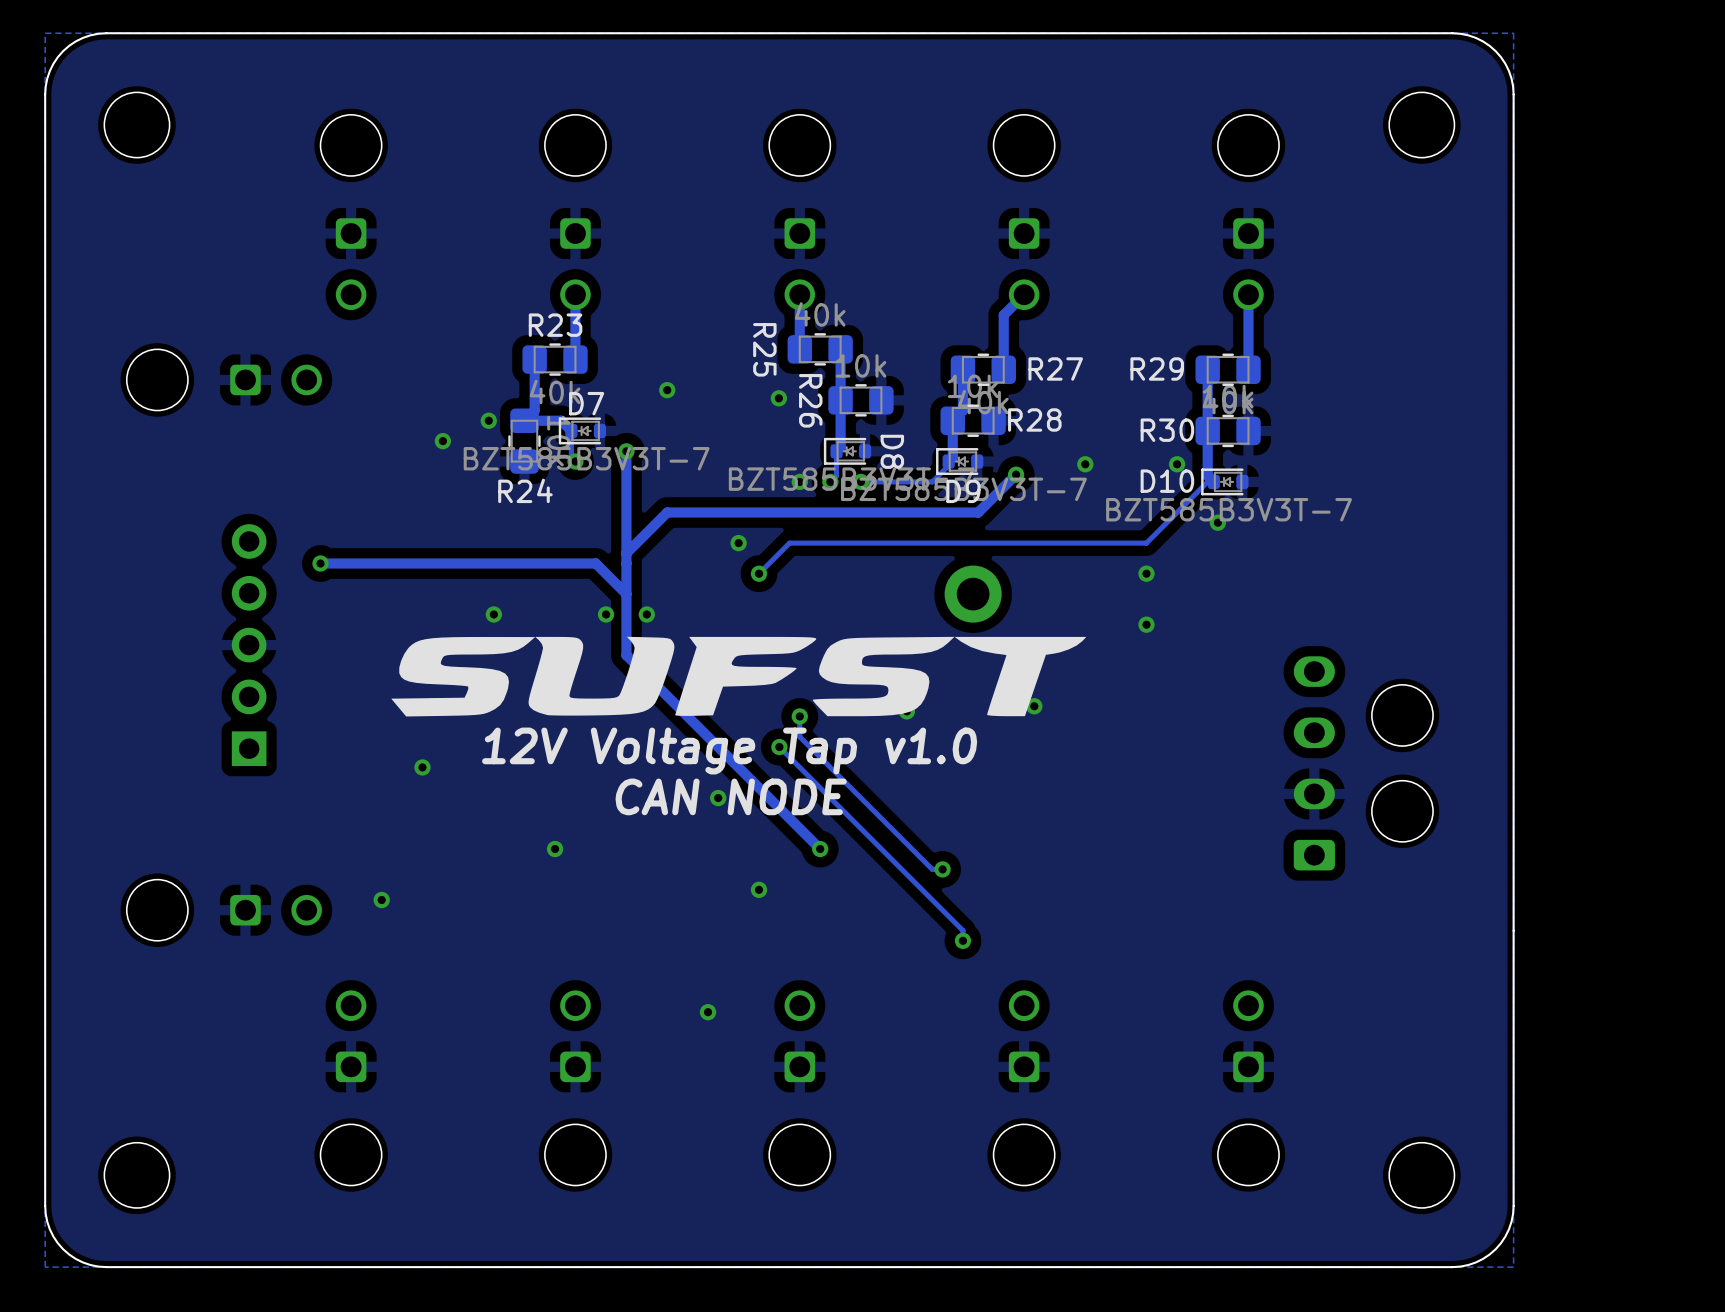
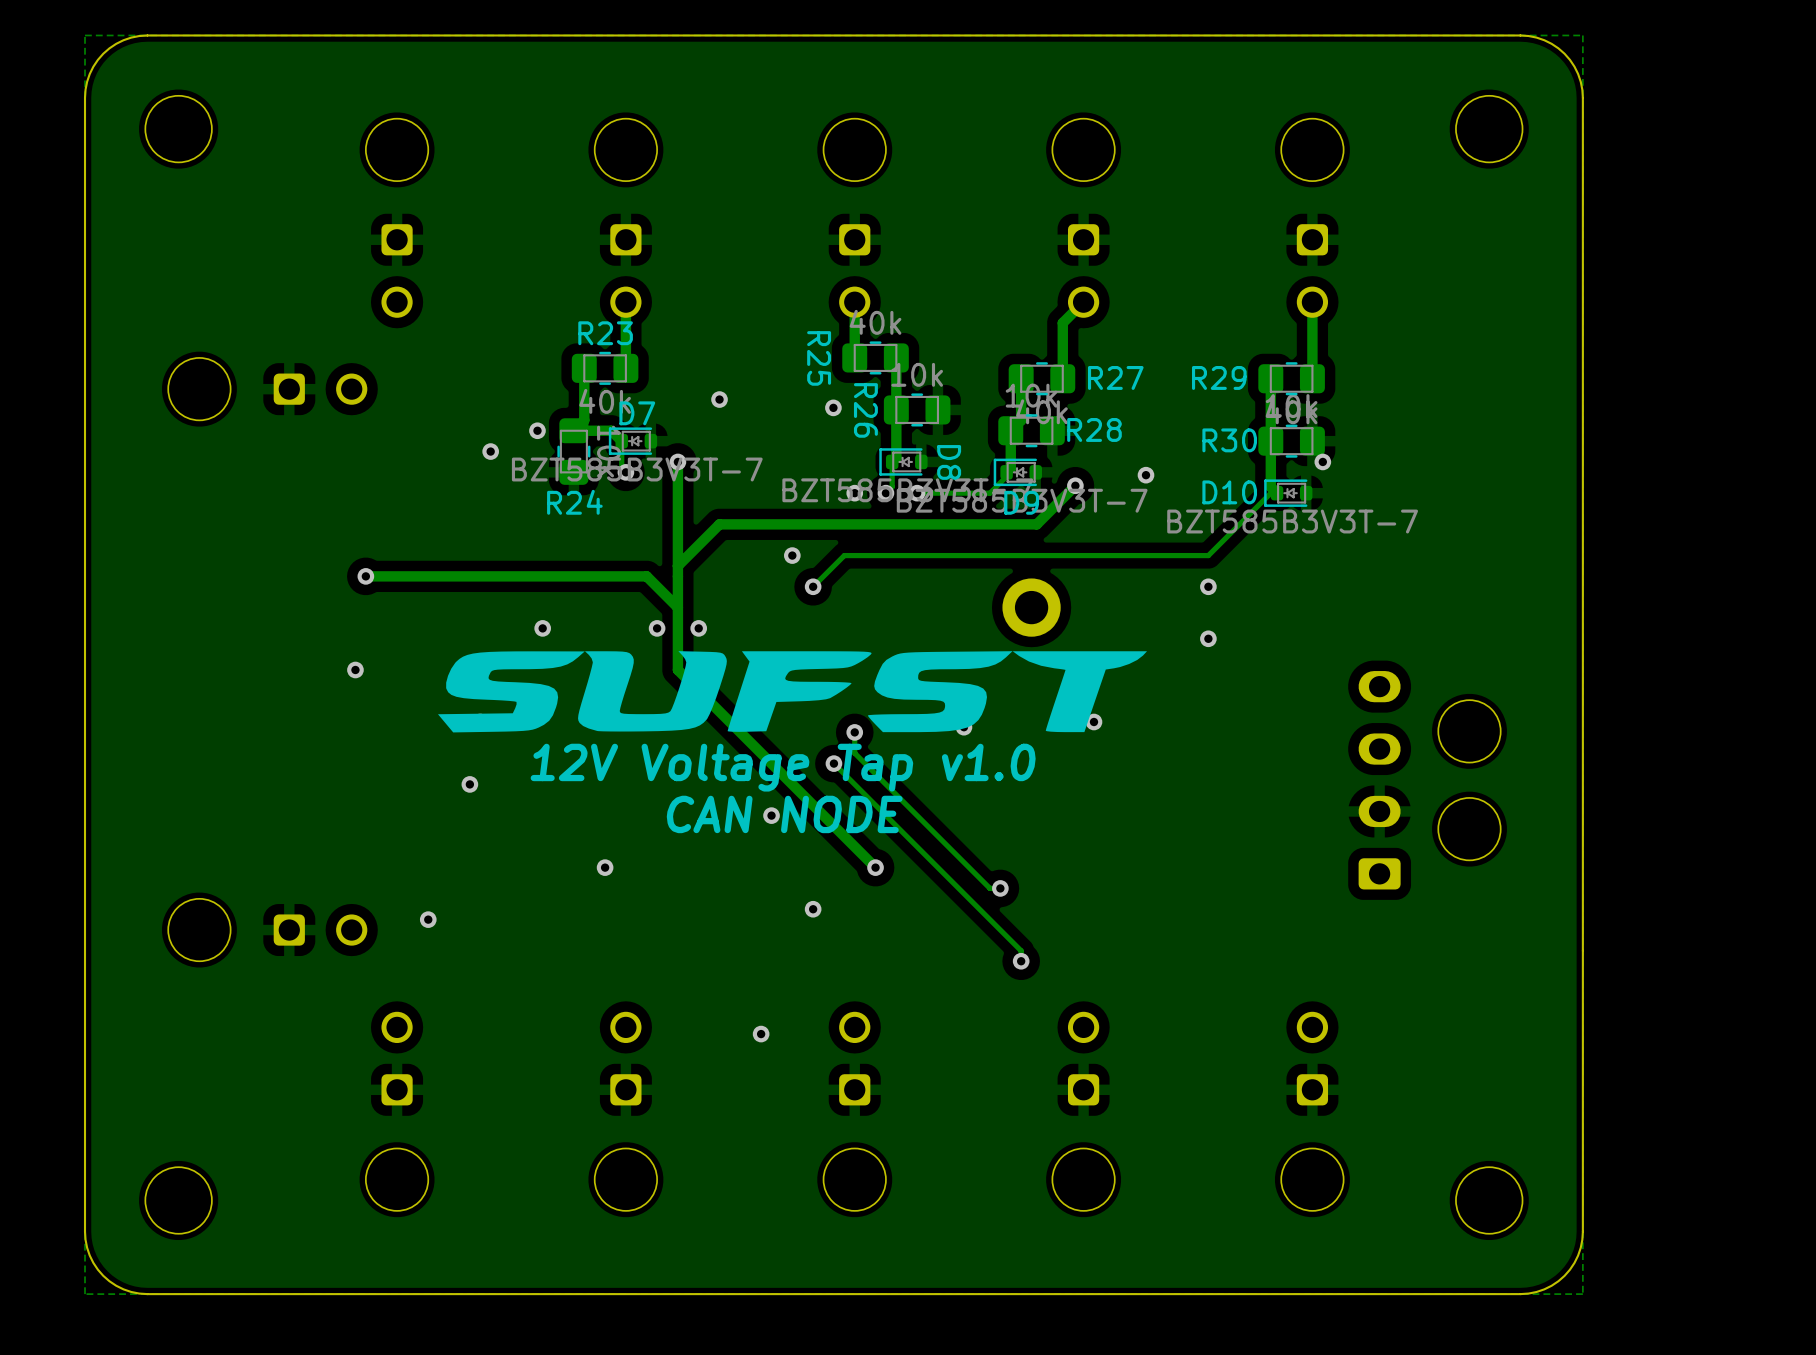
via: none -> (1322, 461)
via: (1177, 464) -> none
via: (1217, 522) -> none
part: (249, 645) -> none
via: none -> (355, 669)

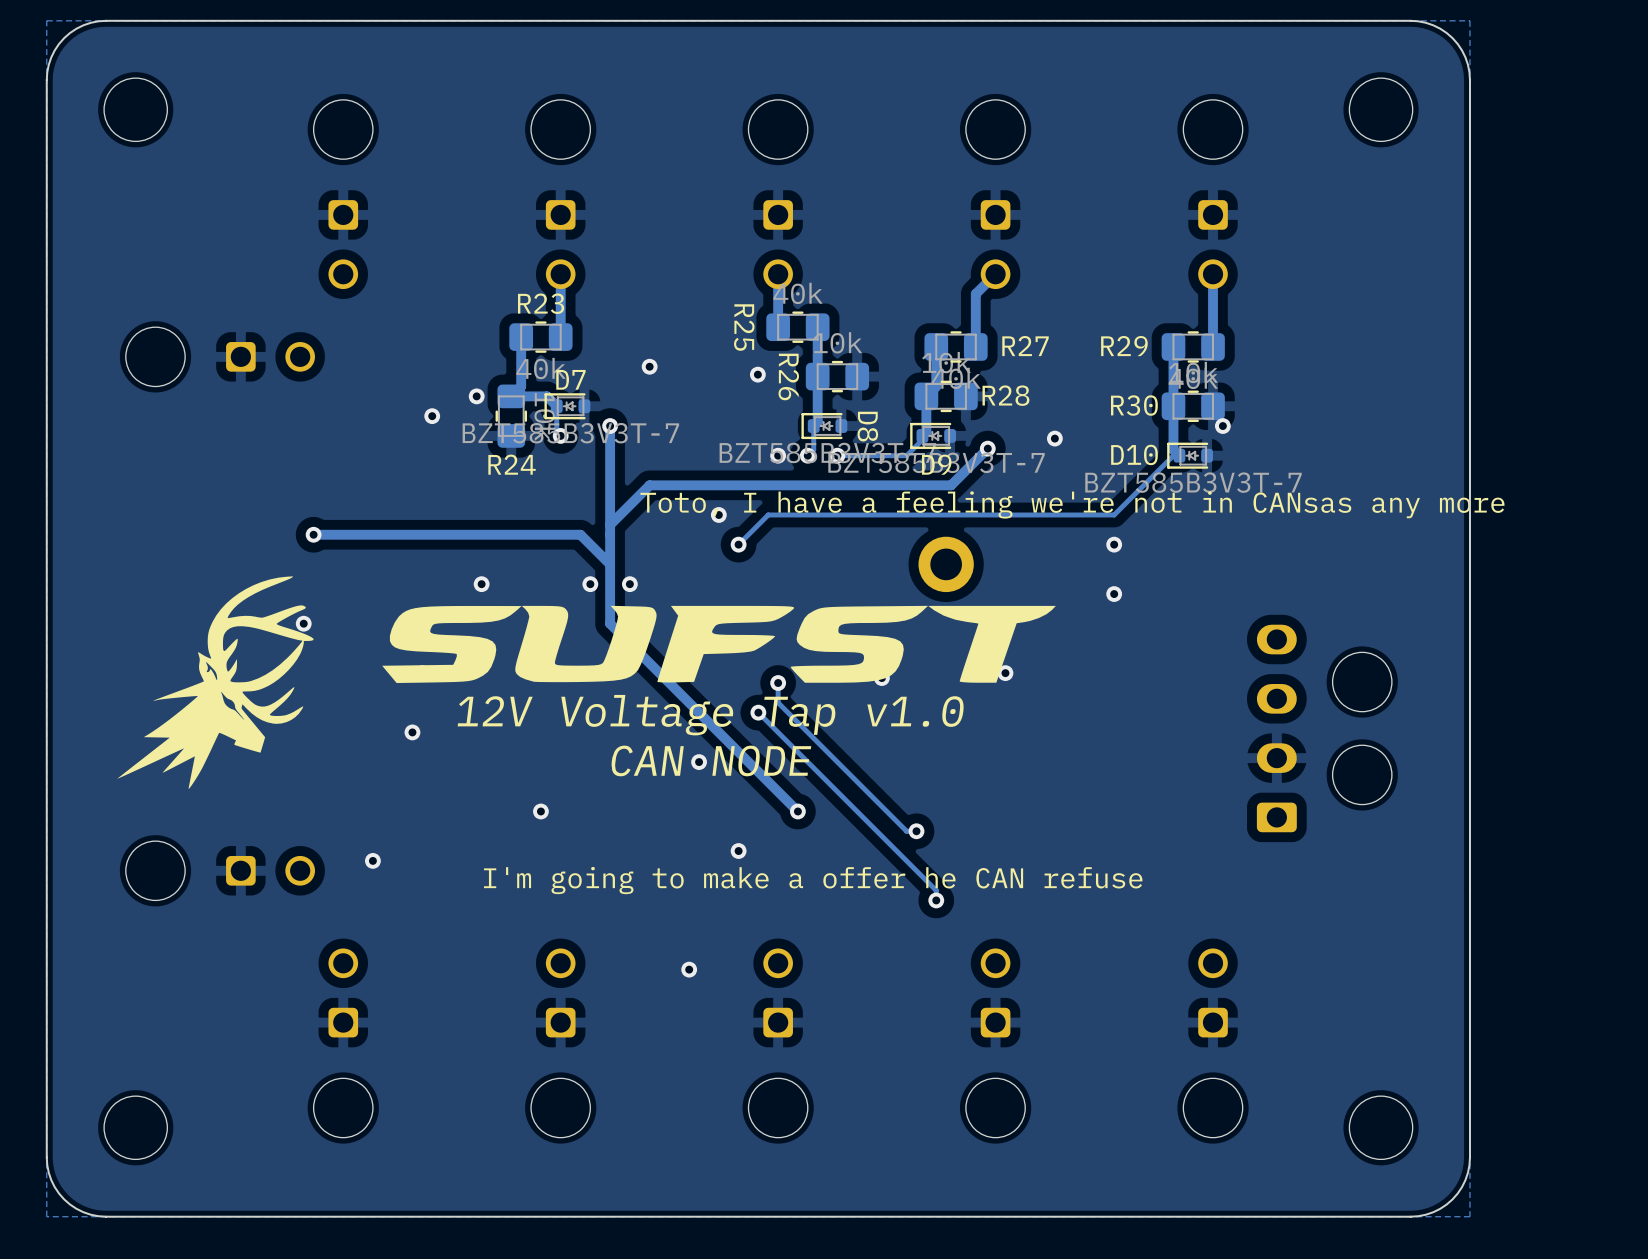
text: none -> Toto, I have a feeling we're not in CANsas any more (1072, 504)
drawing: none -> [117, 576, 314, 789]
text: none -> I'm going to make a offer he CAN refuse (813, 880)

